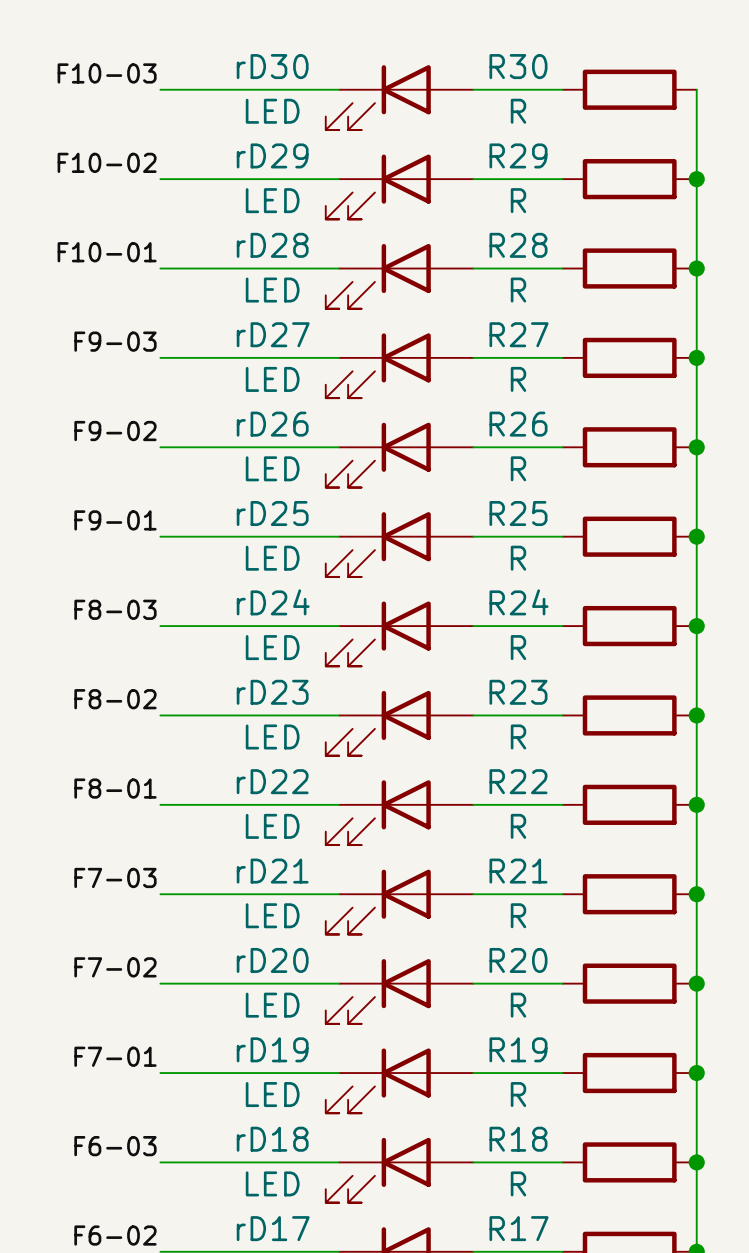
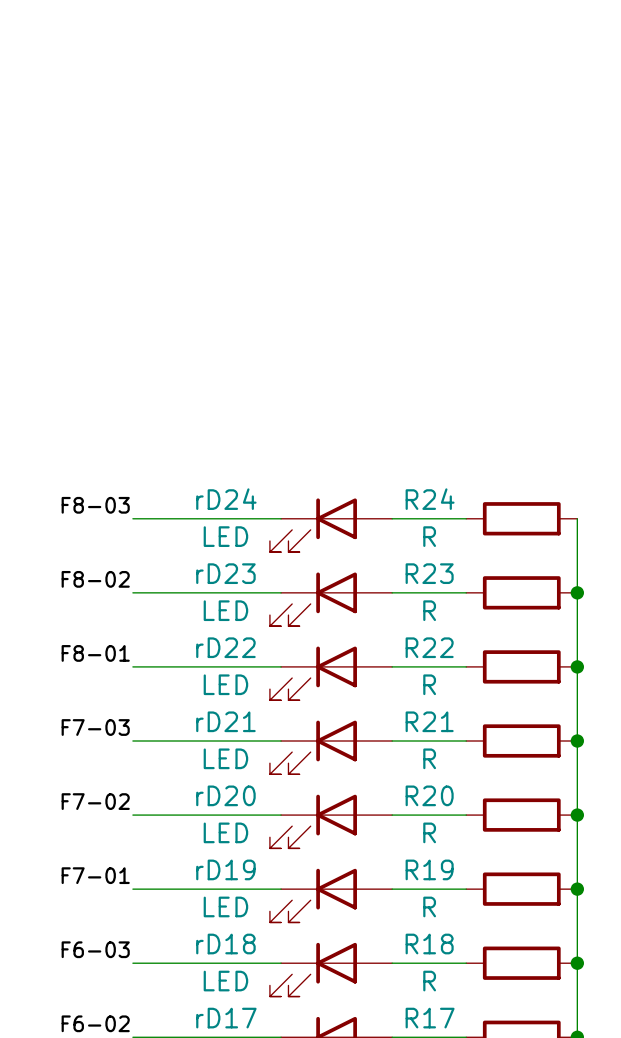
label: F10-03 (107, 73) -> none
wire: (160, 89) (339, 89) -> none
wire: (473, 89) (562, 89) -> none
R30: R (629, 89) -> none
wire: (696, 89) (696, 626) -> none
rD30: LED (399, 97) -> none
label: F10-02 (107, 162) -> none
wire: (160, 179) (339, 179) -> none
wire: (473, 179) (562, 179) -> none
R29: R (629, 179) -> none
junction: (696, 179) -> none
rD29: LED (399, 186) -> none
label: F10-01 (107, 252) -> none
wire: (160, 268) (339, 268) -> none
wire: (473, 268) (562, 268) -> none
R28: R (629, 268) -> none
junction: (696, 268) -> none
rD28: LED (399, 276) -> none
label: F9-03 (115, 341) -> none
wire: (160, 357) (339, 357) -> none
wire: (473, 357) (562, 357) -> none
R27: R (629, 357) -> none
junction: (696, 357) -> none
rD27: LED (399, 365) -> none
label: F9-02 (115, 431) -> none
wire: (160, 447) (339, 447) -> none
wire: (473, 447) (562, 447) -> none
R26: R (629, 447) -> none
junction: (696, 447) -> none
rD26: LED (399, 455) -> none
label: F9-01 (115, 520) -> none
wire: (160, 536) (339, 536) -> none
wire: (473, 536) (562, 536) -> none
R25: R (629, 536) -> none
junction: (696, 536) -> none
rD25: LED (399, 544) -> none
junction: (696, 626) -> none

